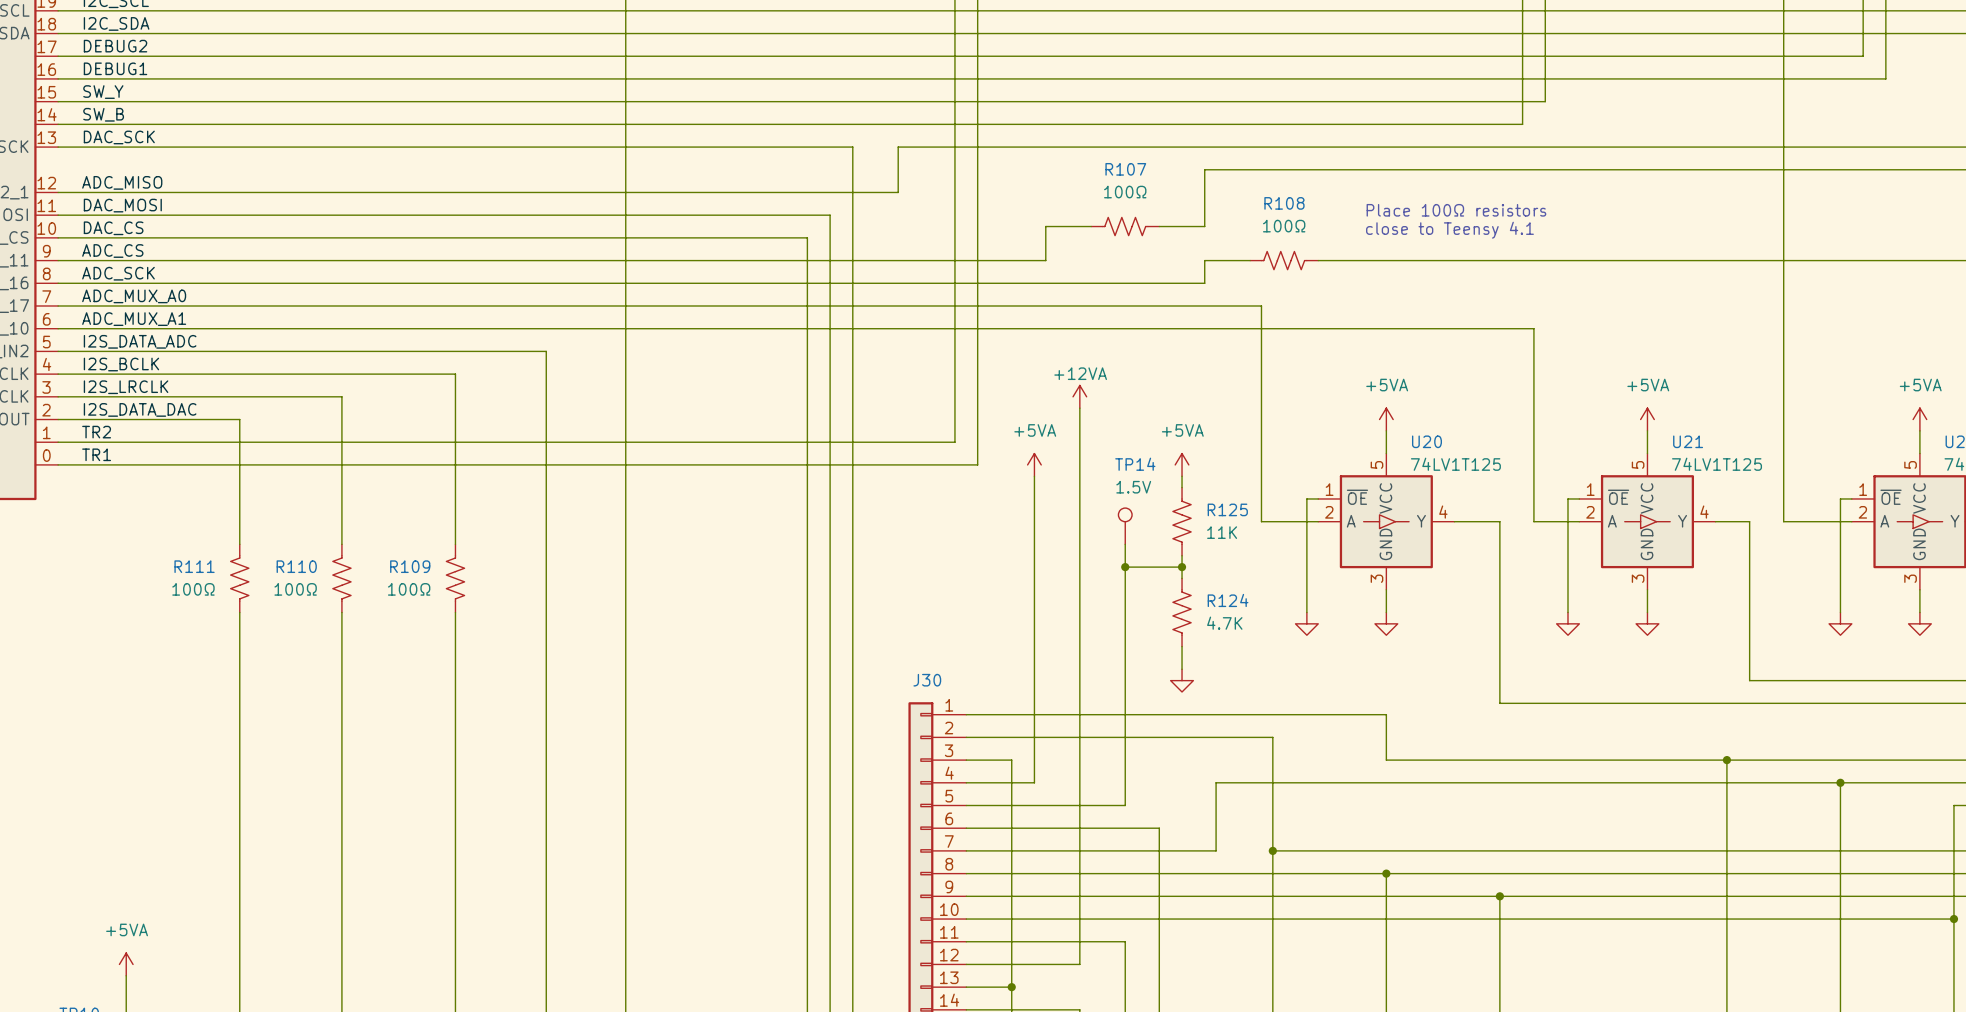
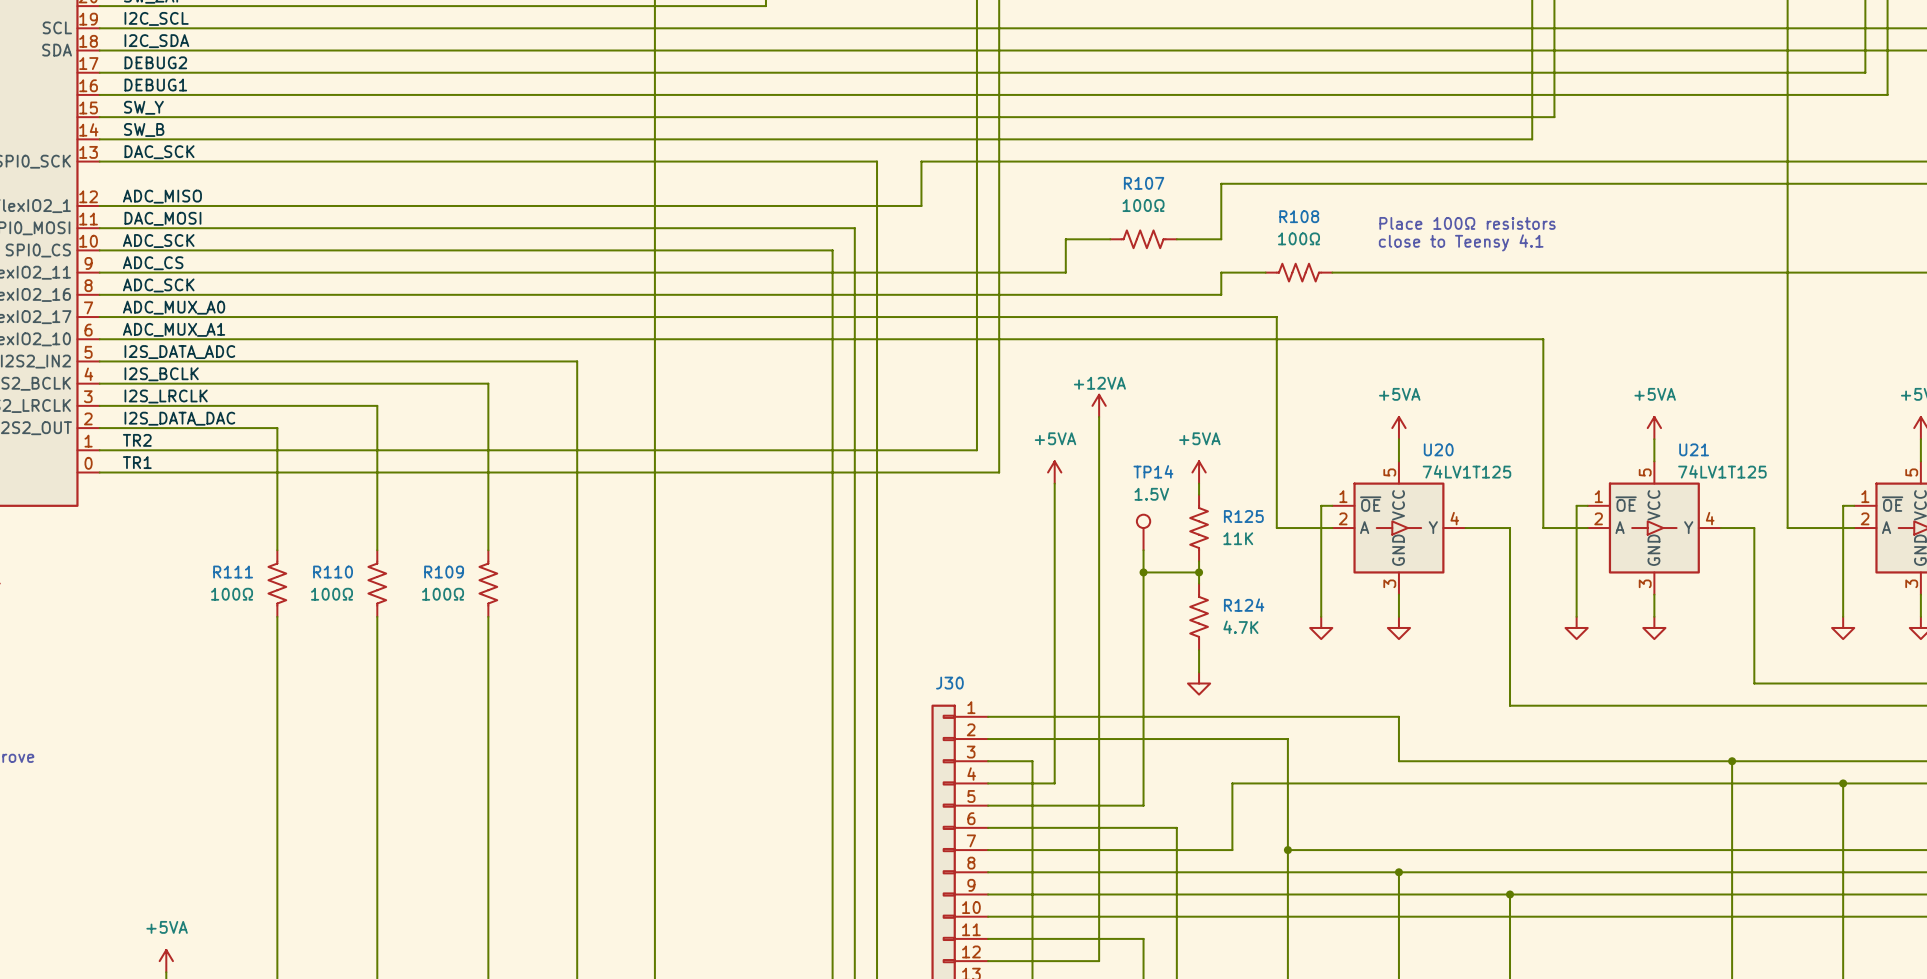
label: DAC_CS (113, 228) -> ADC_SCK (158, 241)

